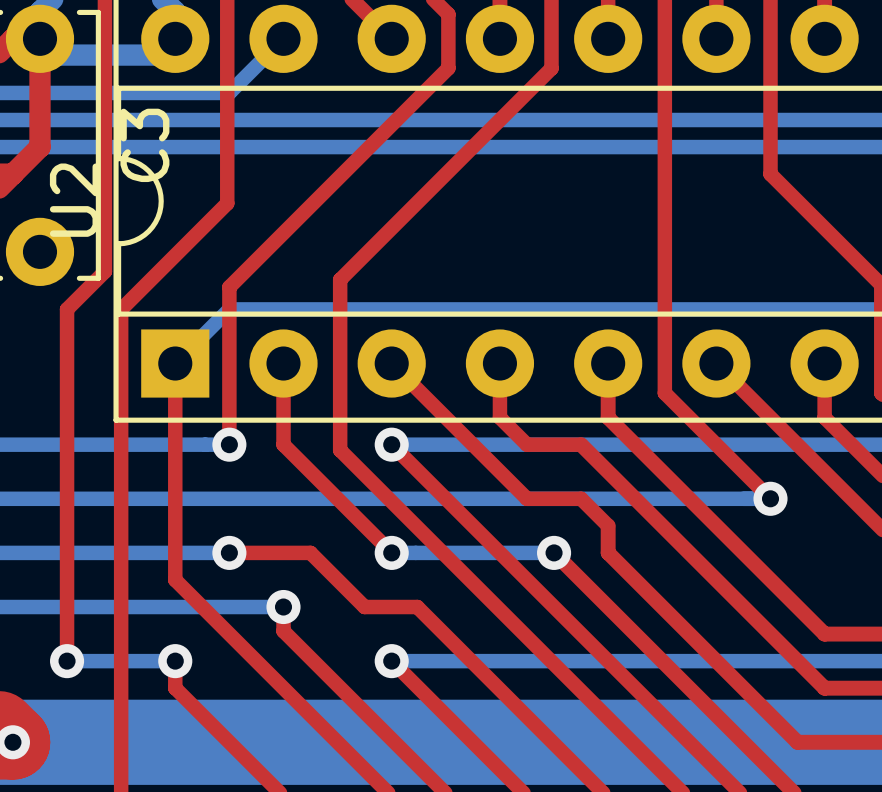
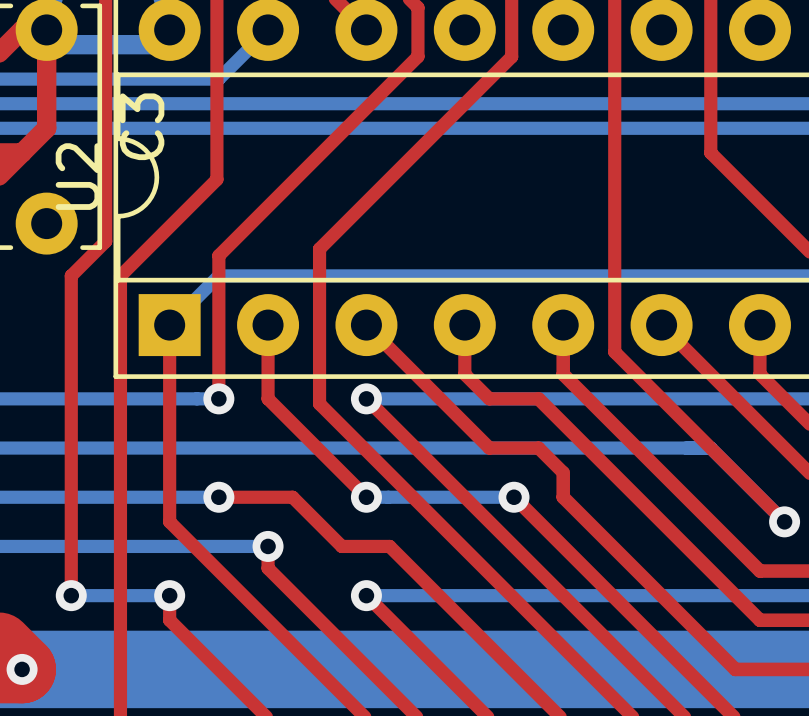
top track: none -> (710, 448) (784, 521)
via position: (770, 498) -> (784, 521)

